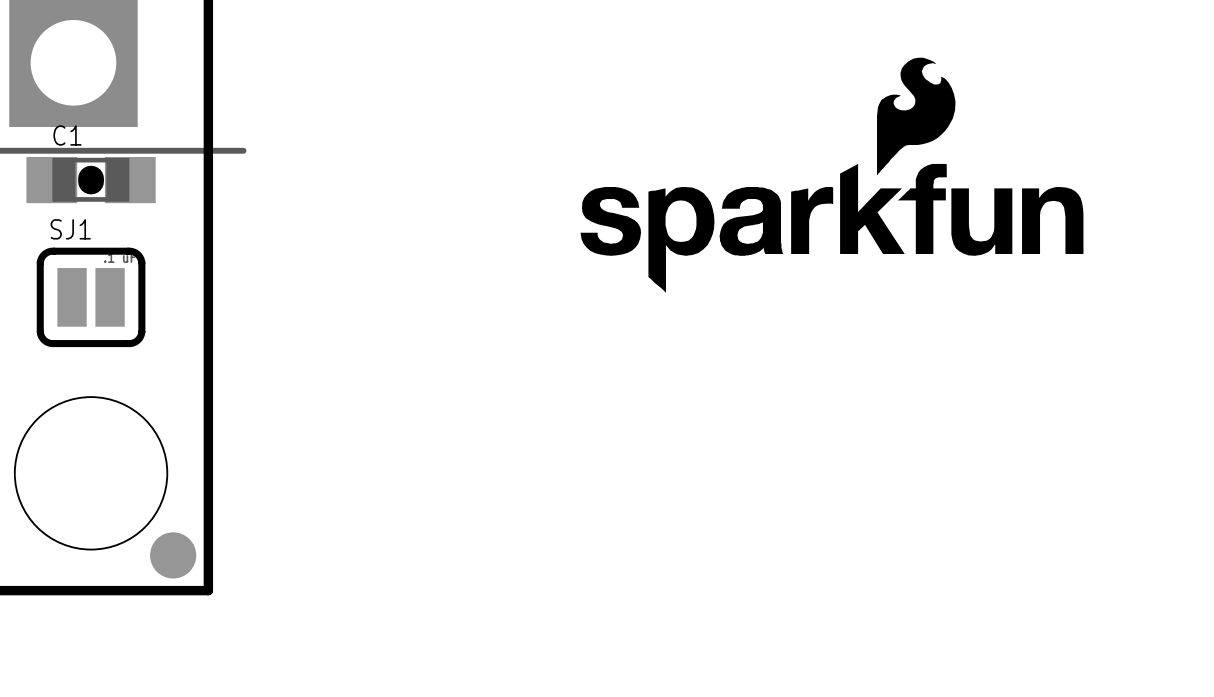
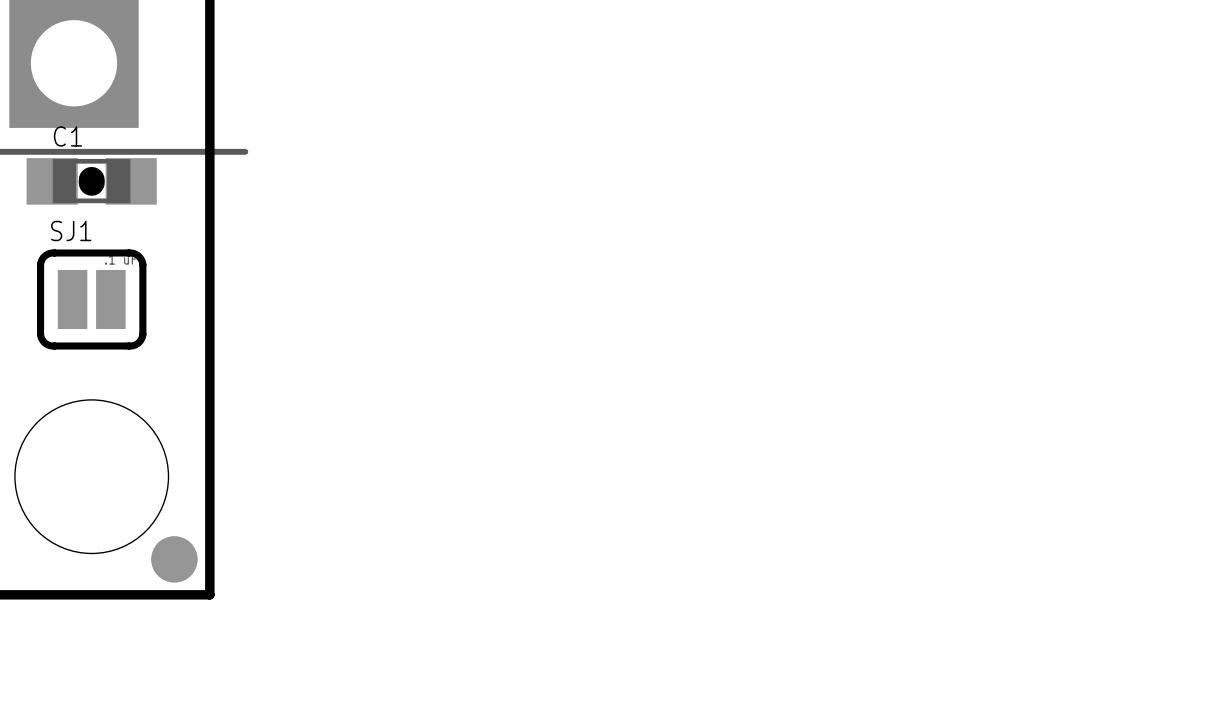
drawing: [580, 57, 1084, 293] -> none

